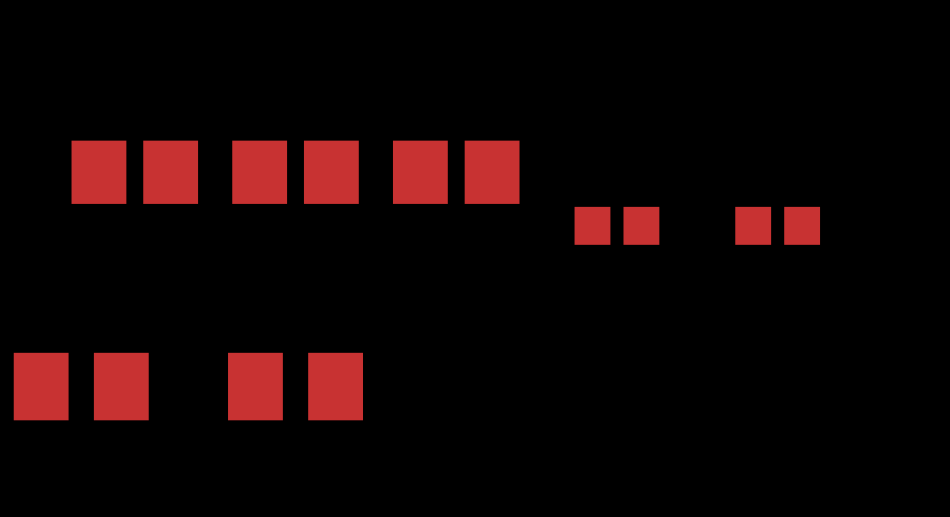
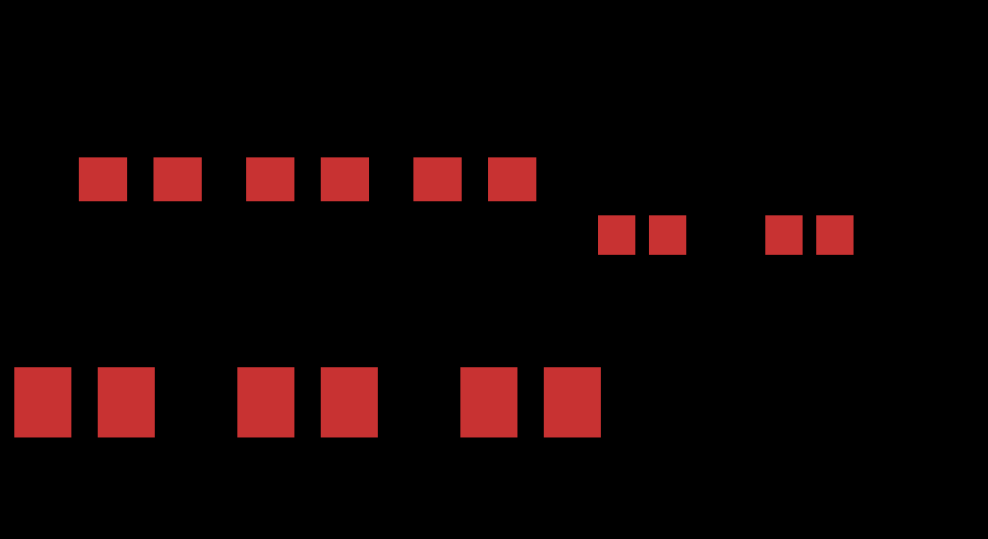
part footprint: [71, 140, 199, 204] -> [78, 157, 202, 202]
part footprint: [232, 140, 359, 204] -> [246, 157, 370, 202]
part footprint: [392, 140, 520, 204] -> [413, 157, 537, 202]
part: none -> (530, 402)

